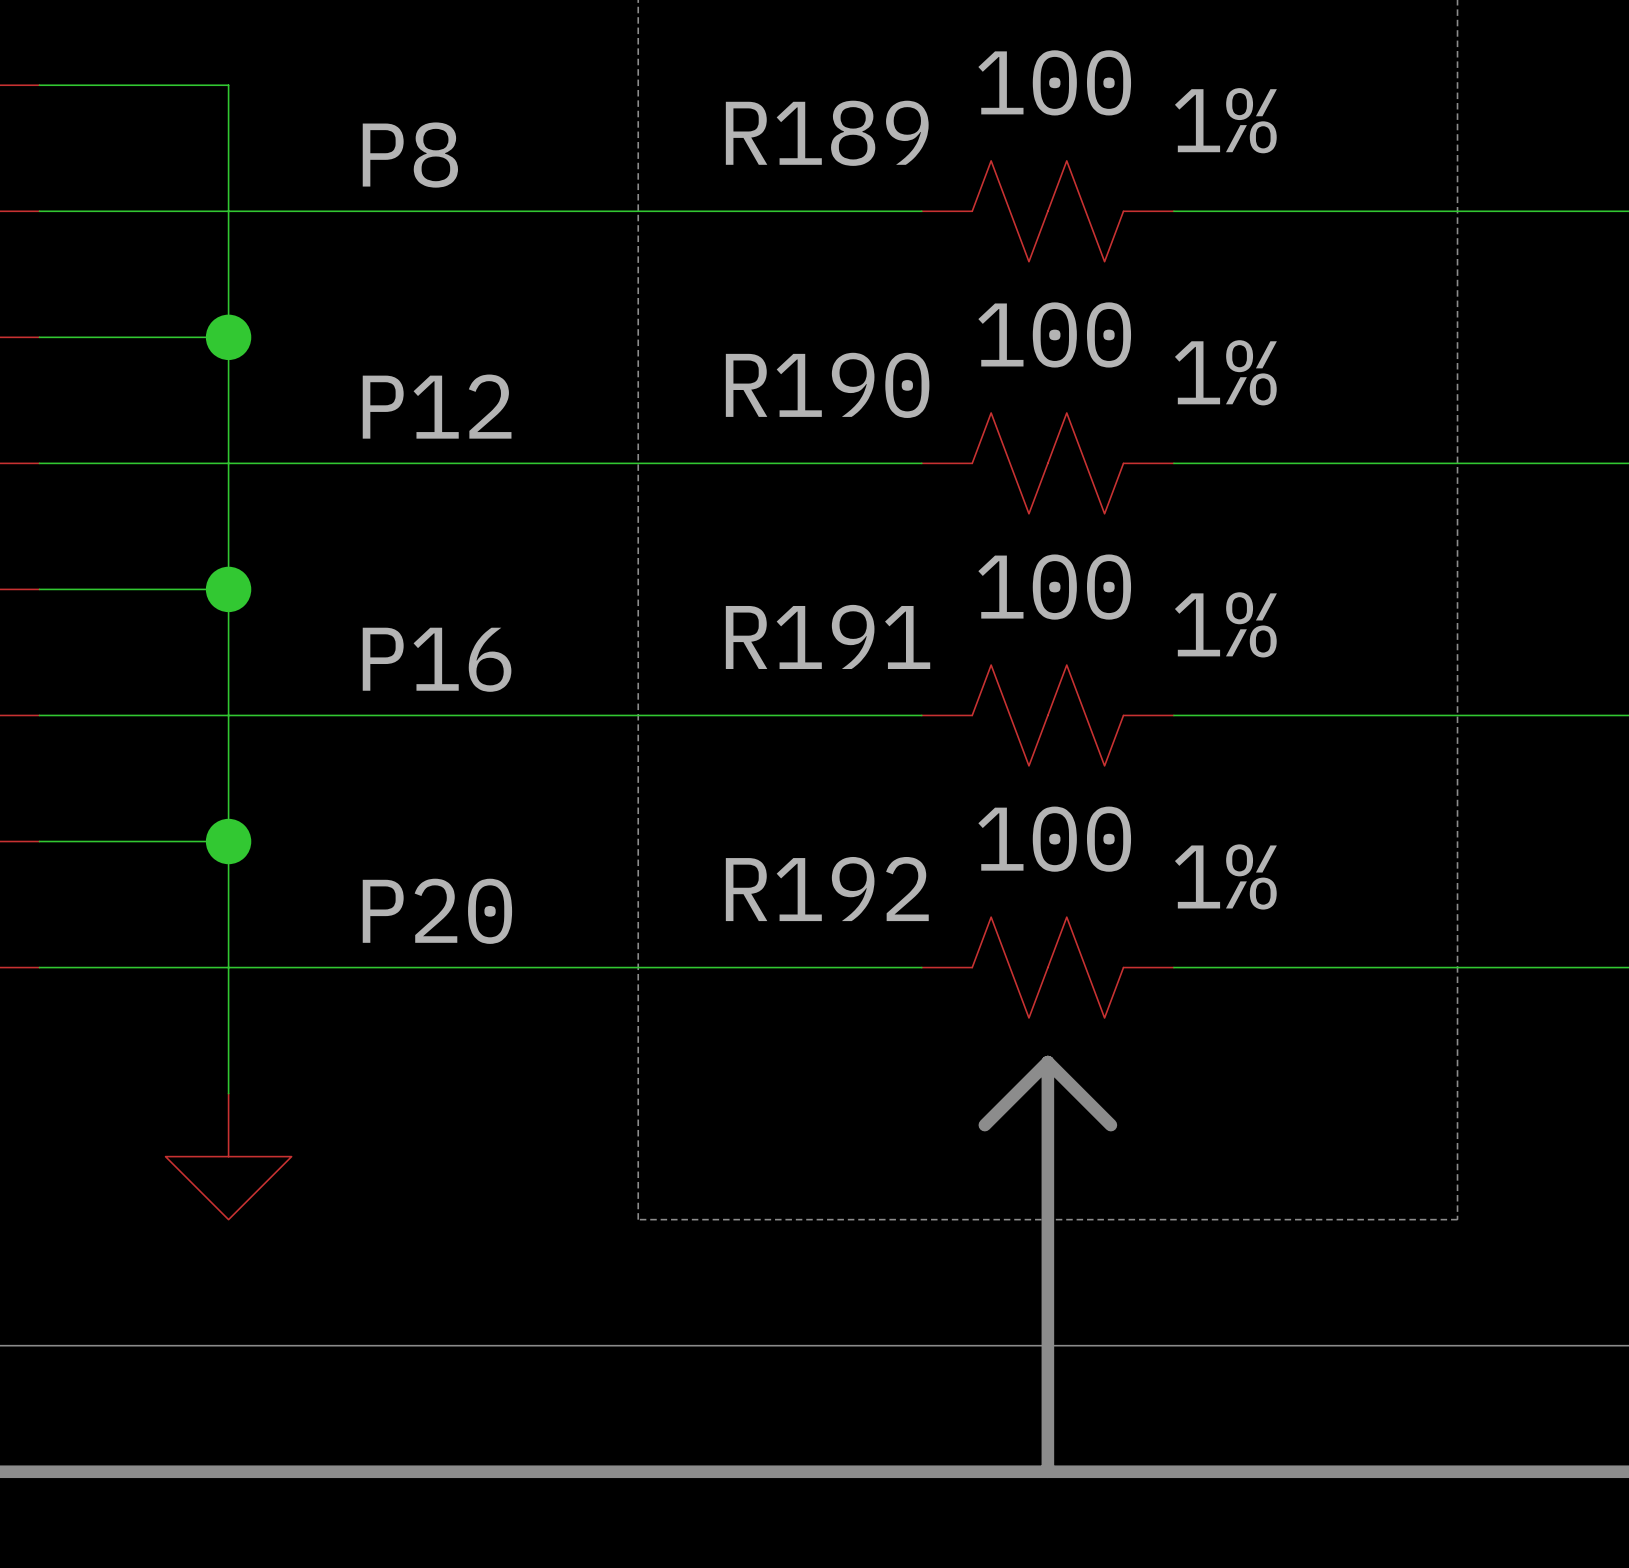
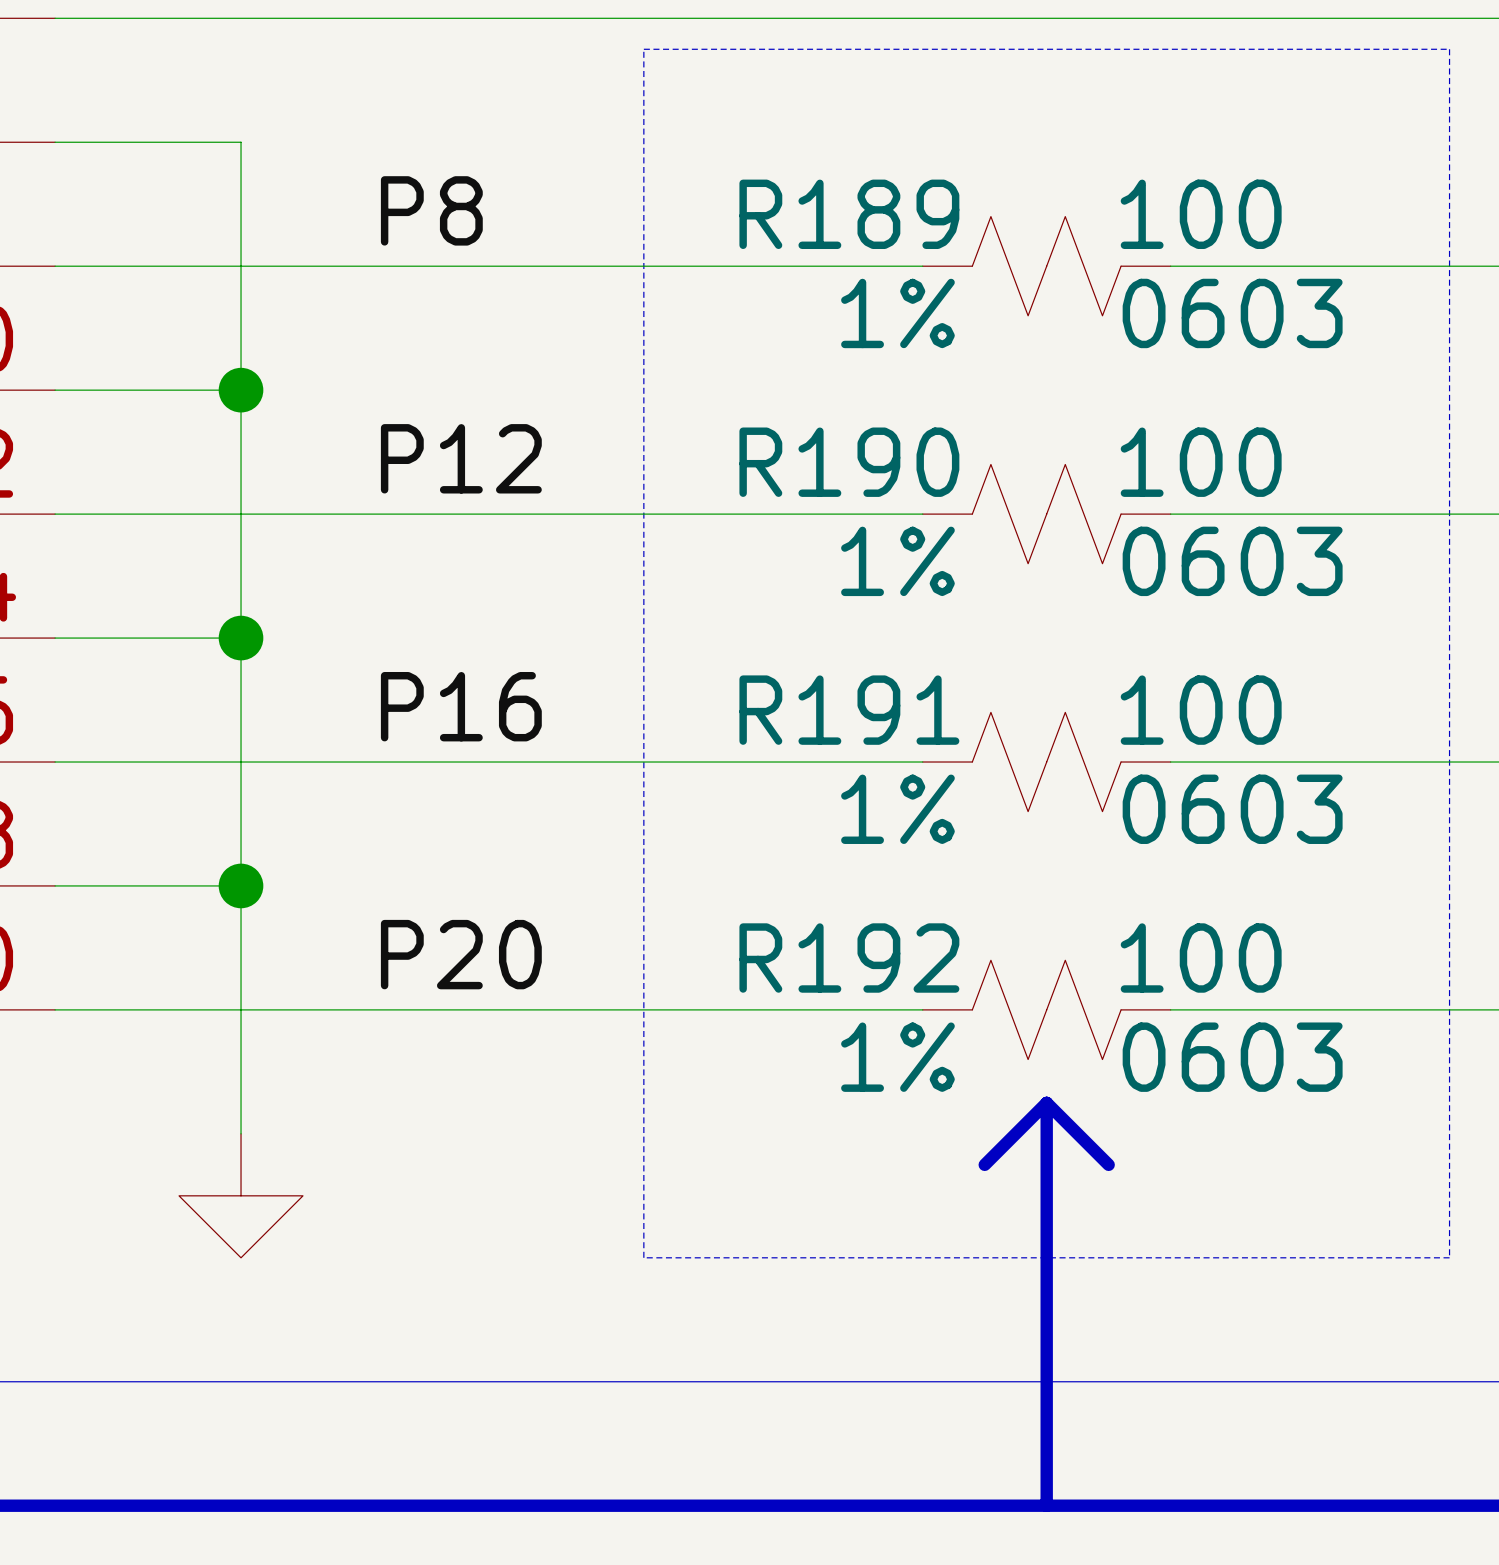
R189 value position: 100 (1054, 82) -> 100 (1201, 214)
R189 text position: 1% (1225, 120) -> 1% (897, 313)
R189 name position: R189 (827, 133) -> R189 (849, 214)
R189 text: none -> 0603 (1232, 313)
R190 value position: 100 (1054, 334) -> 100 (1201, 462)
R190 text position: 1% (1225, 372) -> 1% (897, 561)
R190 name position: R190 (827, 385) -> R190 (849, 462)
R190 text: none -> 0603 (1232, 561)
R191 value position: 100 (1054, 587) -> 100 (1201, 710)
R191 text position: 1% (1225, 624) -> 1% (897, 809)
R191 name position: R191 (828, 636) -> R191 (849, 710)
R191 text: none -> 0603 (1232, 809)
R192 value position: 100 (1054, 839) -> 100 (1201, 958)
R192 text position: 1% (1225, 876) -> 1% (897, 1057)
R192 name position: R192 (827, 889) -> R192 (849, 958)
R192 text: none -> 0603 (1232, 1057)

